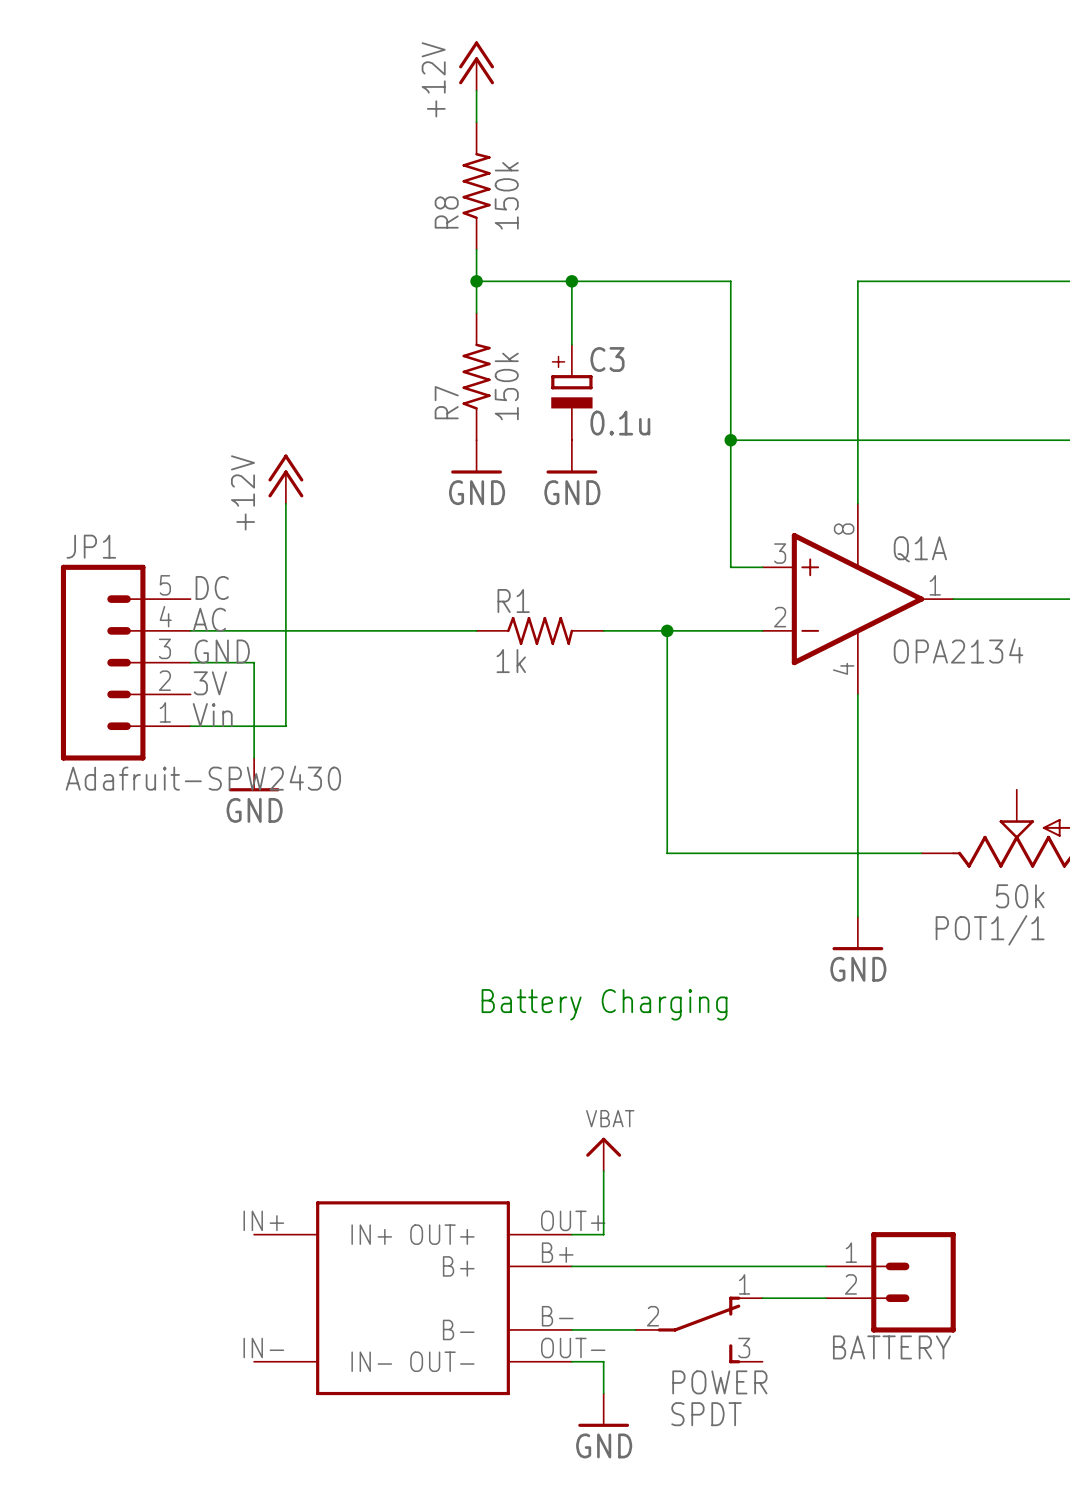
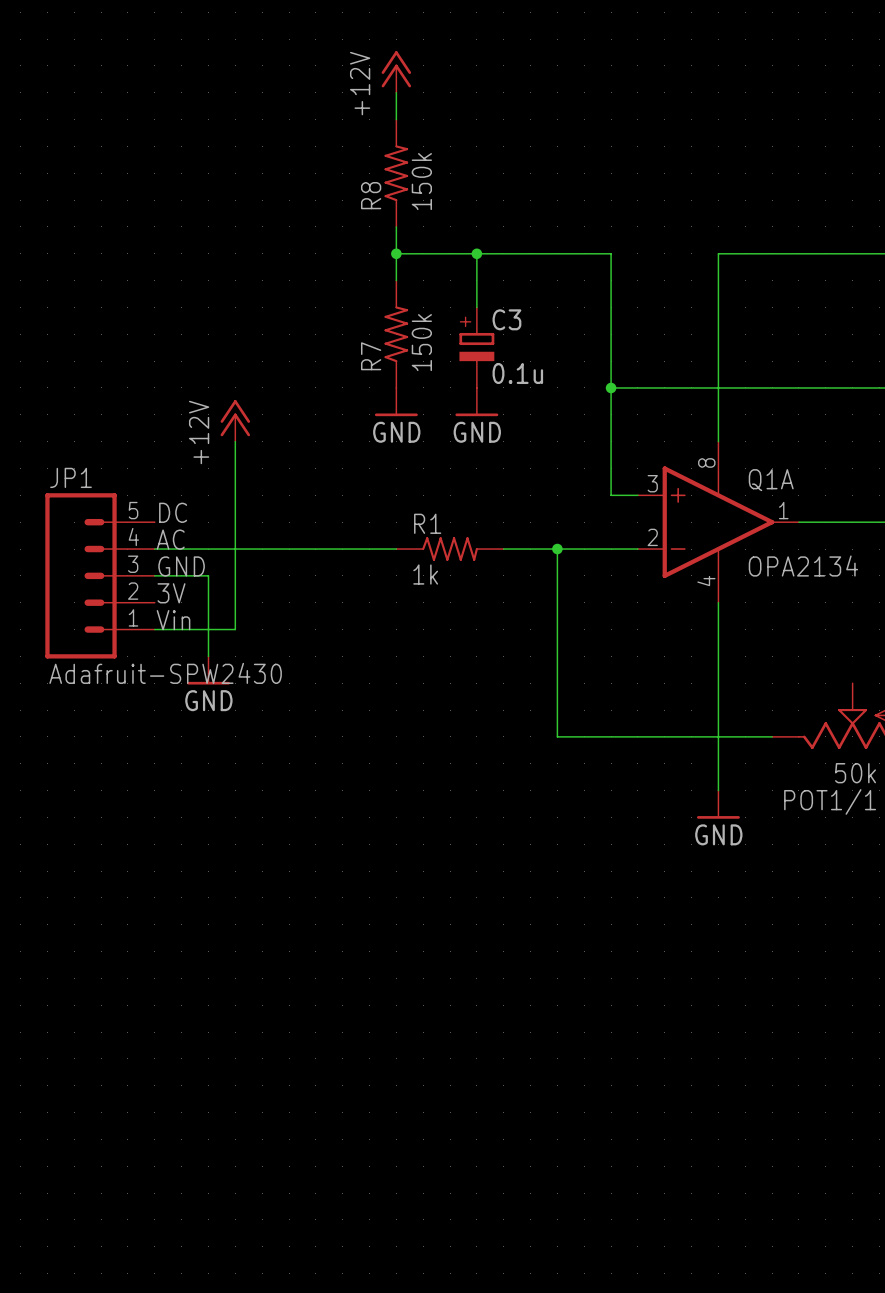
text: Battery Charging (604, 1004) -> none
power symbol: VBAT (603, 1154) -> none
wire: (603, 1171) (603, 1234) (571, 1234) -> none
wire: (571, 1266) (826, 1266) -> none
BATTERY: (890, 1282) -> none
part: (413, 1298) -> none
wire: (762, 1298) (826, 1298) -> none
wire: (571, 1329) (635, 1329) -> none
POWER: SPDT (699, 1329) -> none
wire: (571, 1361) (603, 1361) (603, 1393) -> none
power symbol: GND (603, 1410) -> none

